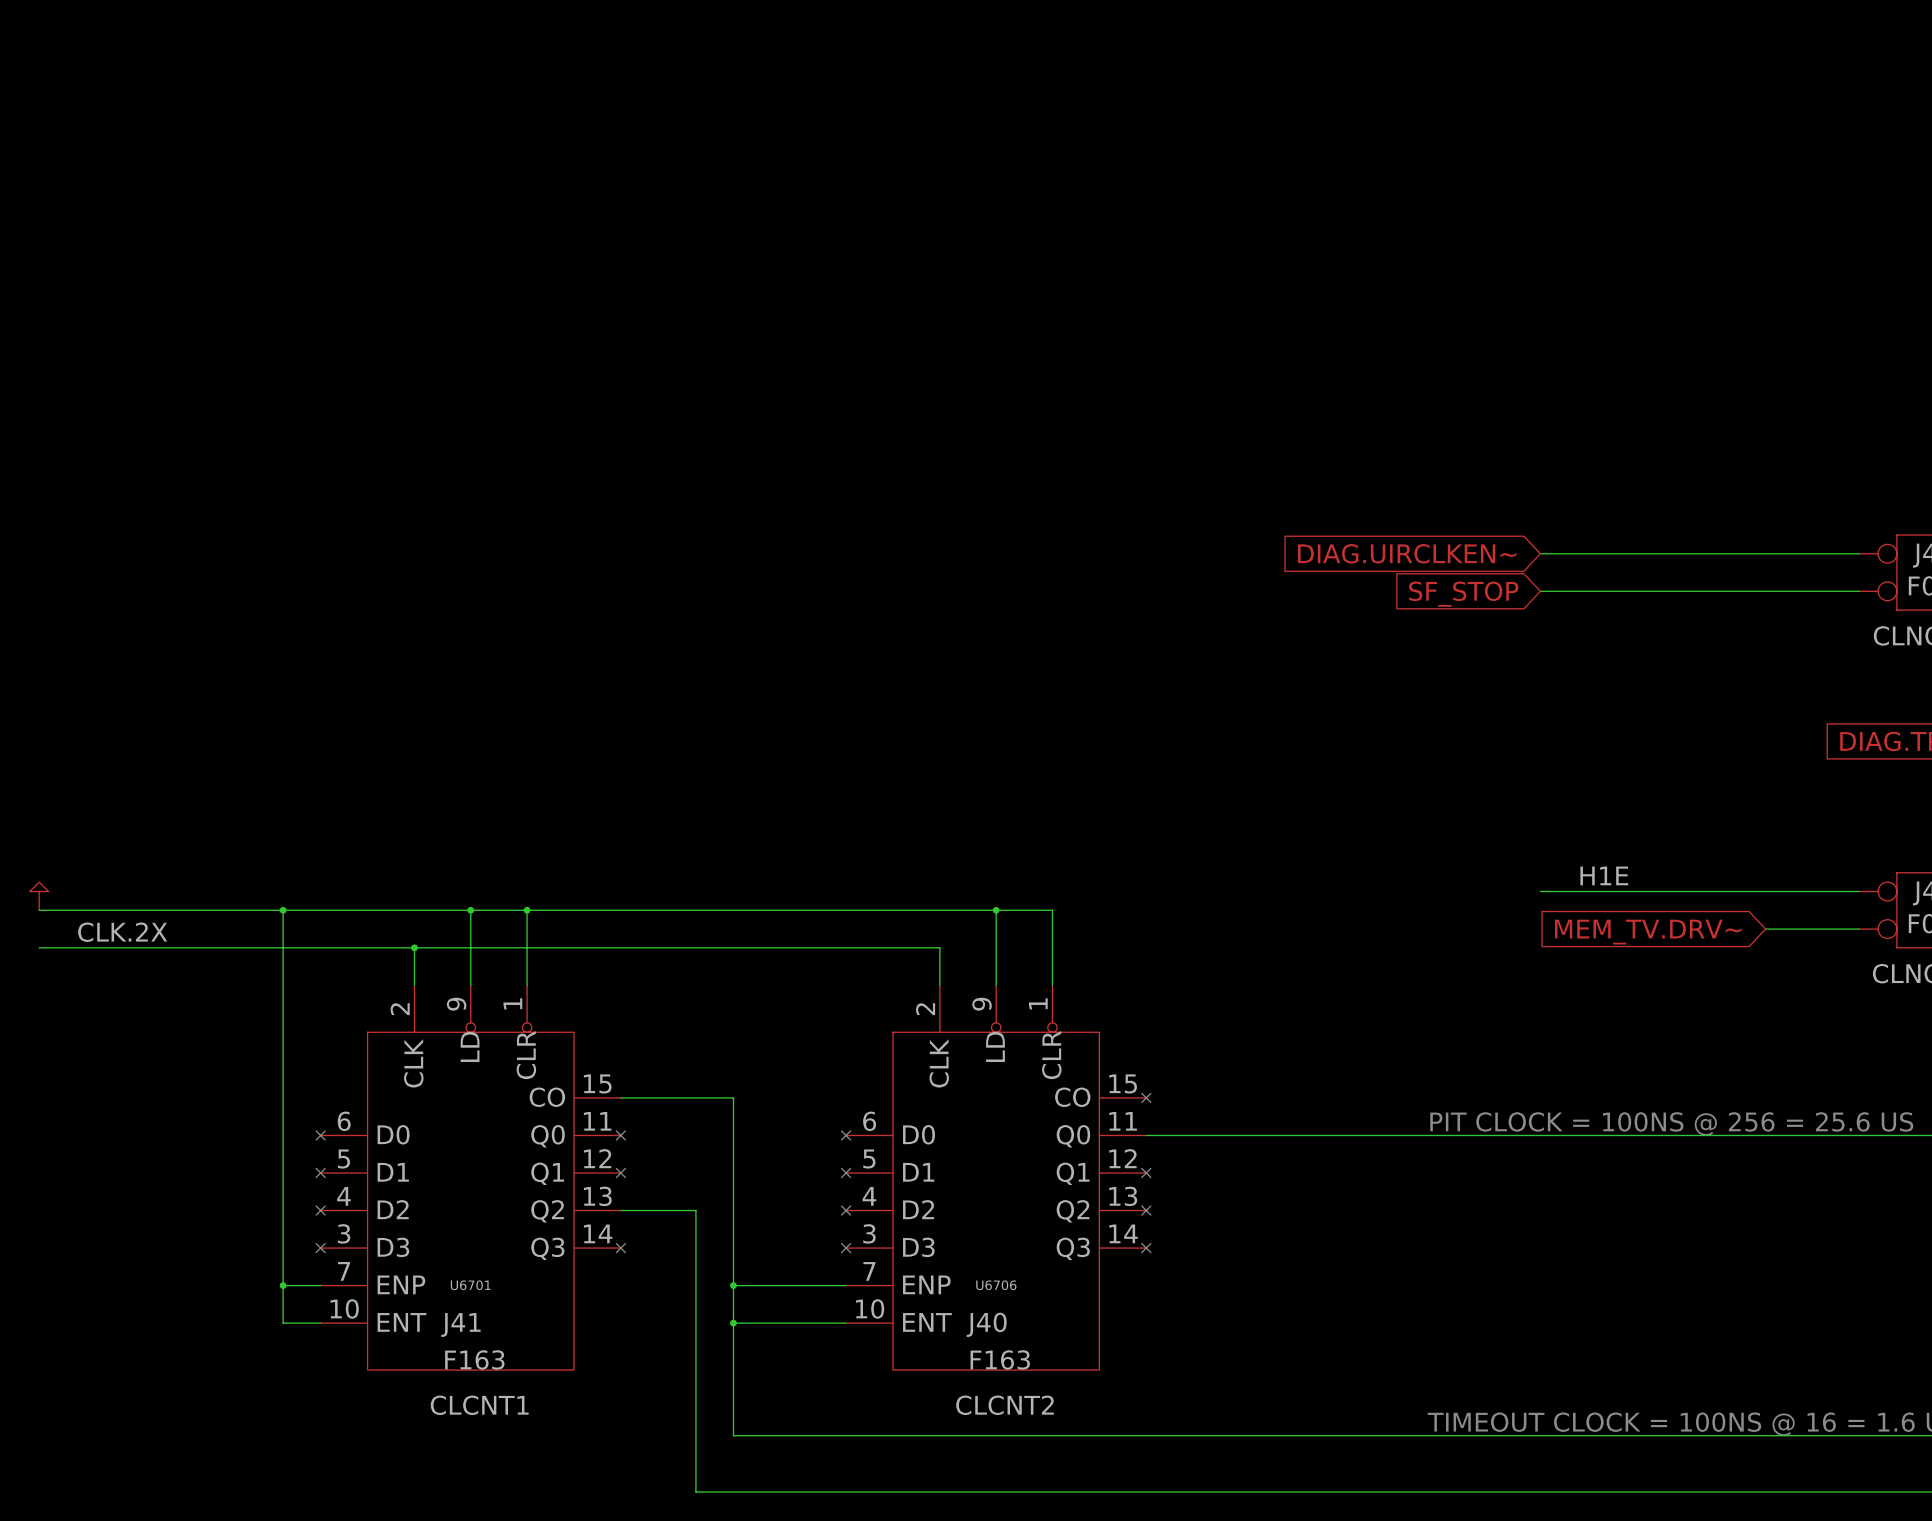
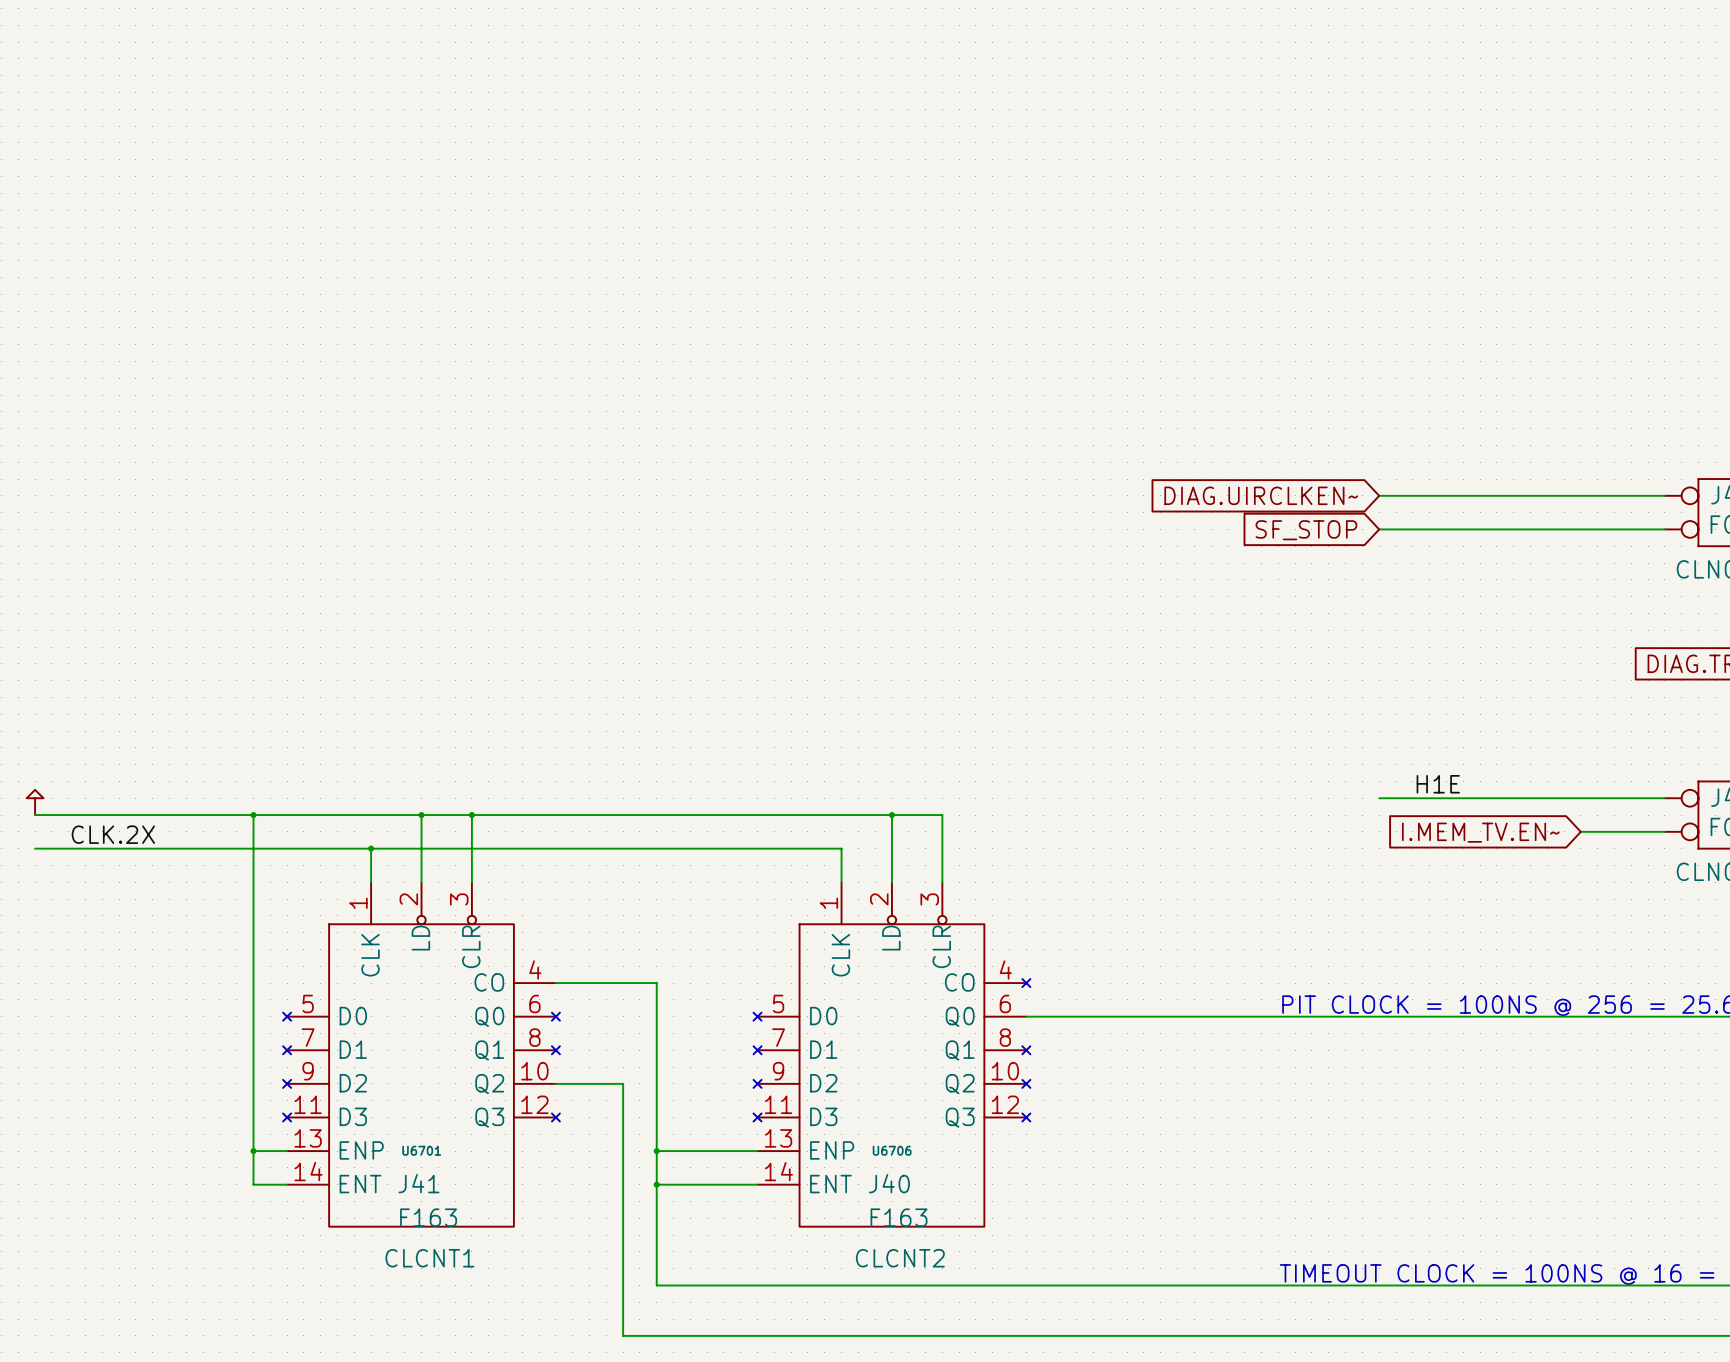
global label: MEM_TV.DRV~ (1648, 932) -> I.MEM_TV.EN~ (1480, 832)
U6701 symbol: [320, 985, 621, 1371] -> [287, 882, 556, 1227]
U6706 symbol: [846, 985, 1147, 1371] -> [757, 882, 1027, 1227]

